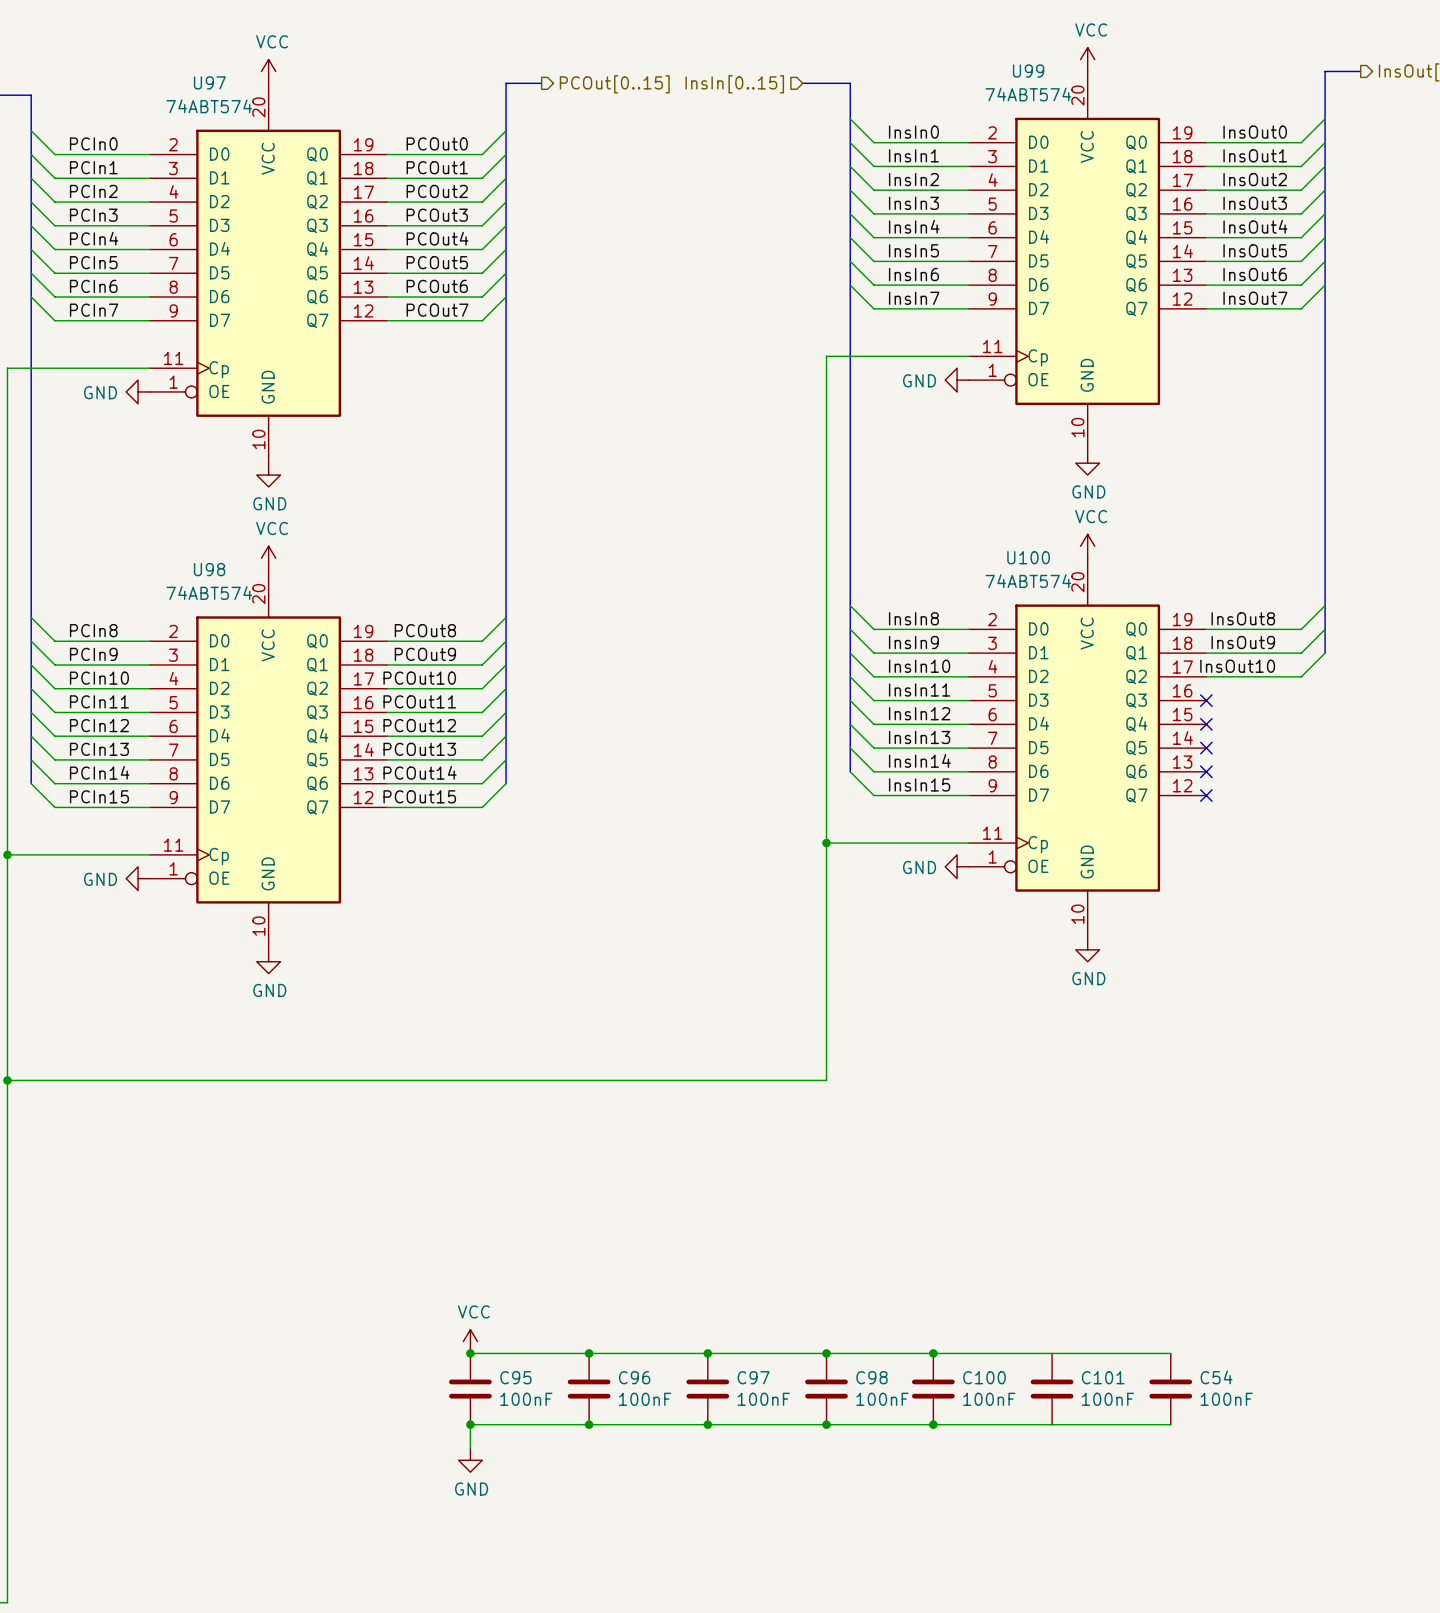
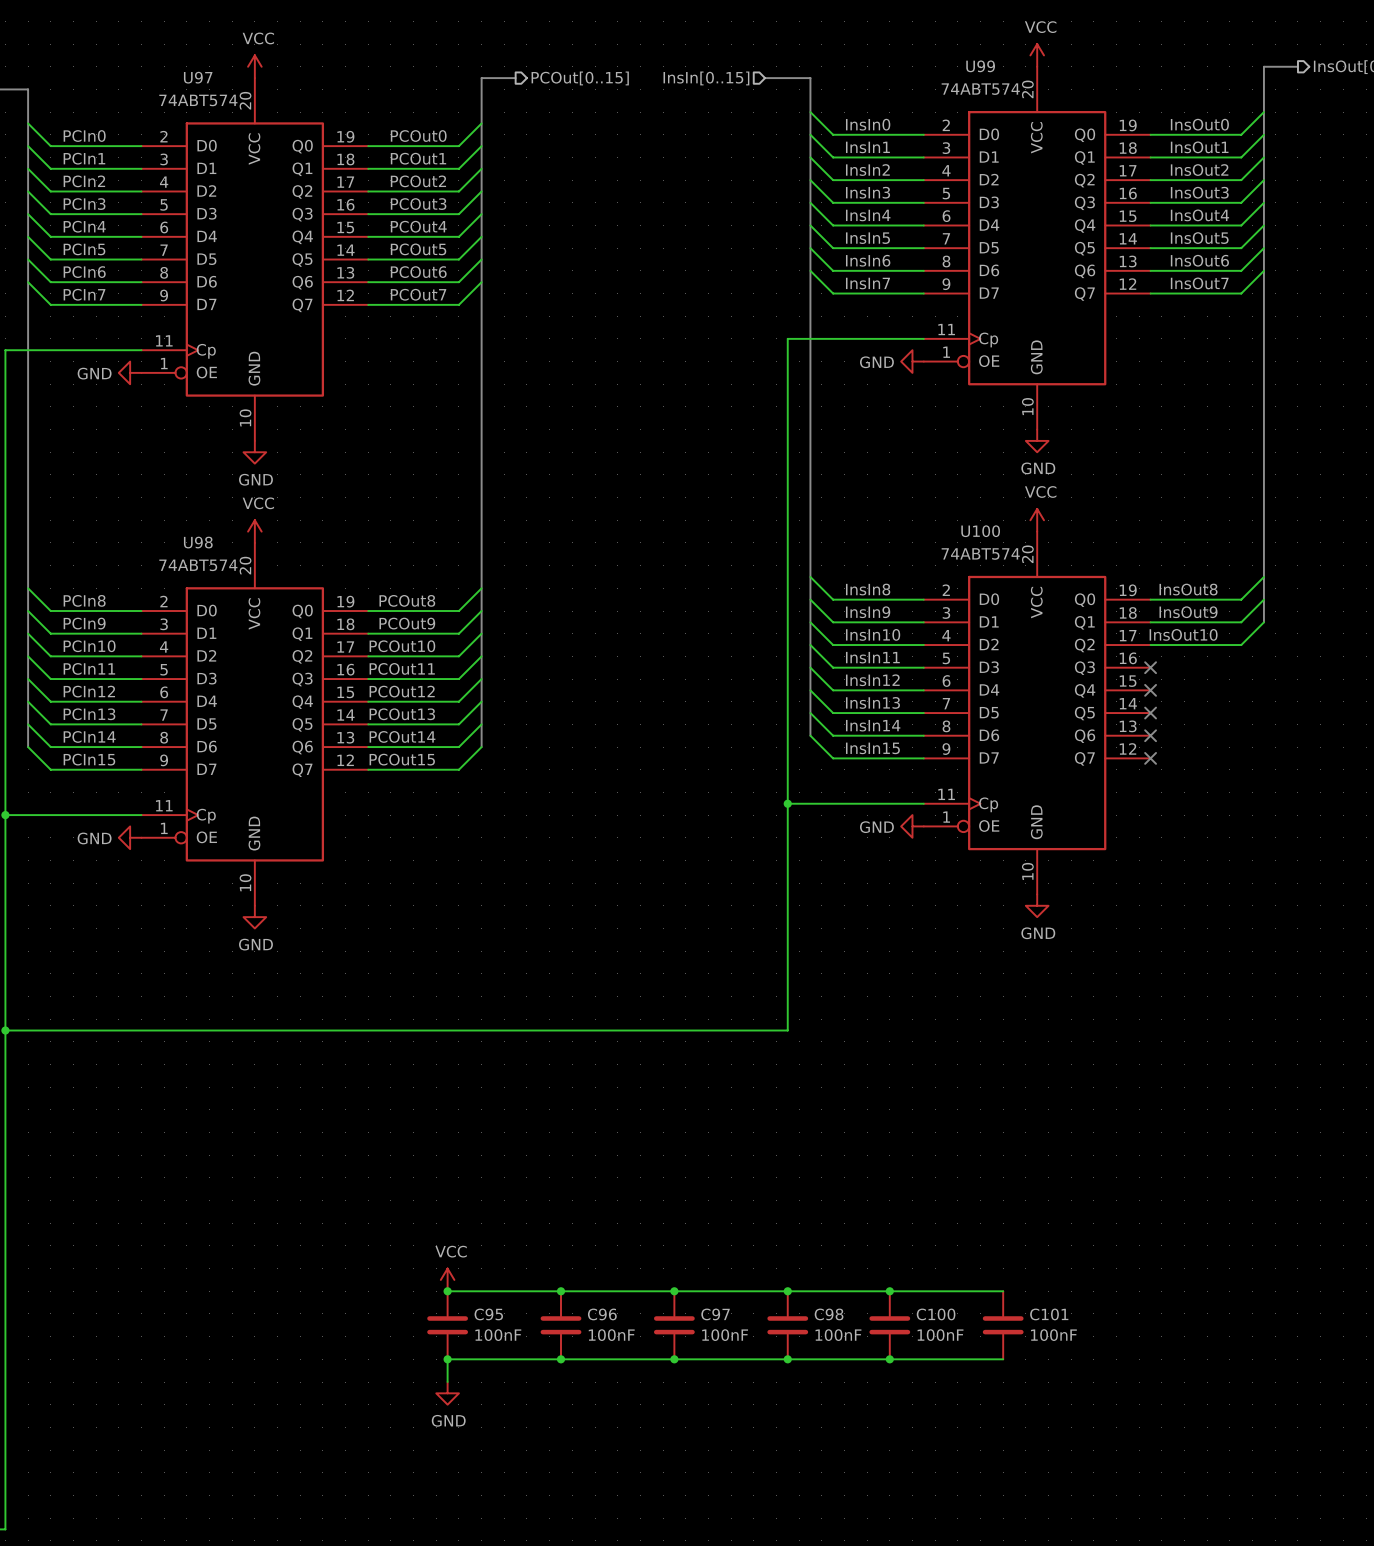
wire: (1052, 1353) (1170, 1353) -> none
C54: 100nF (1170, 1389) -> none
wire: (1052, 1424) (1170, 1424) -> none

